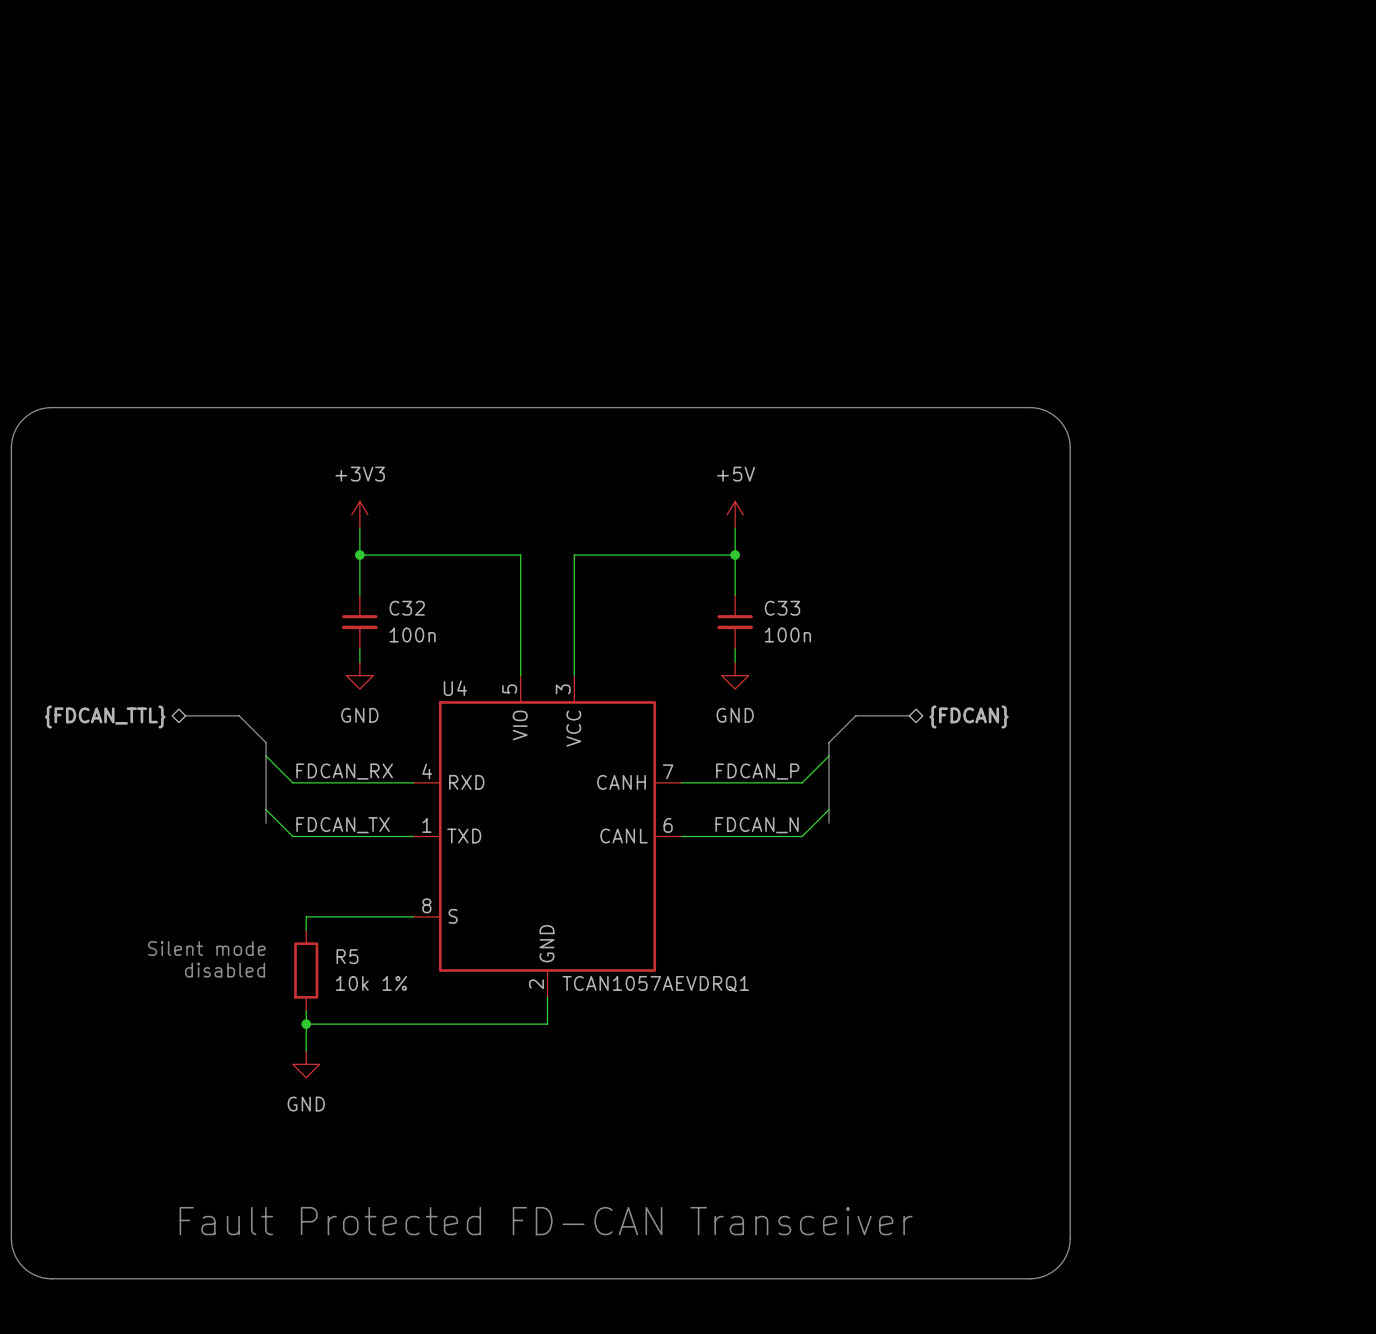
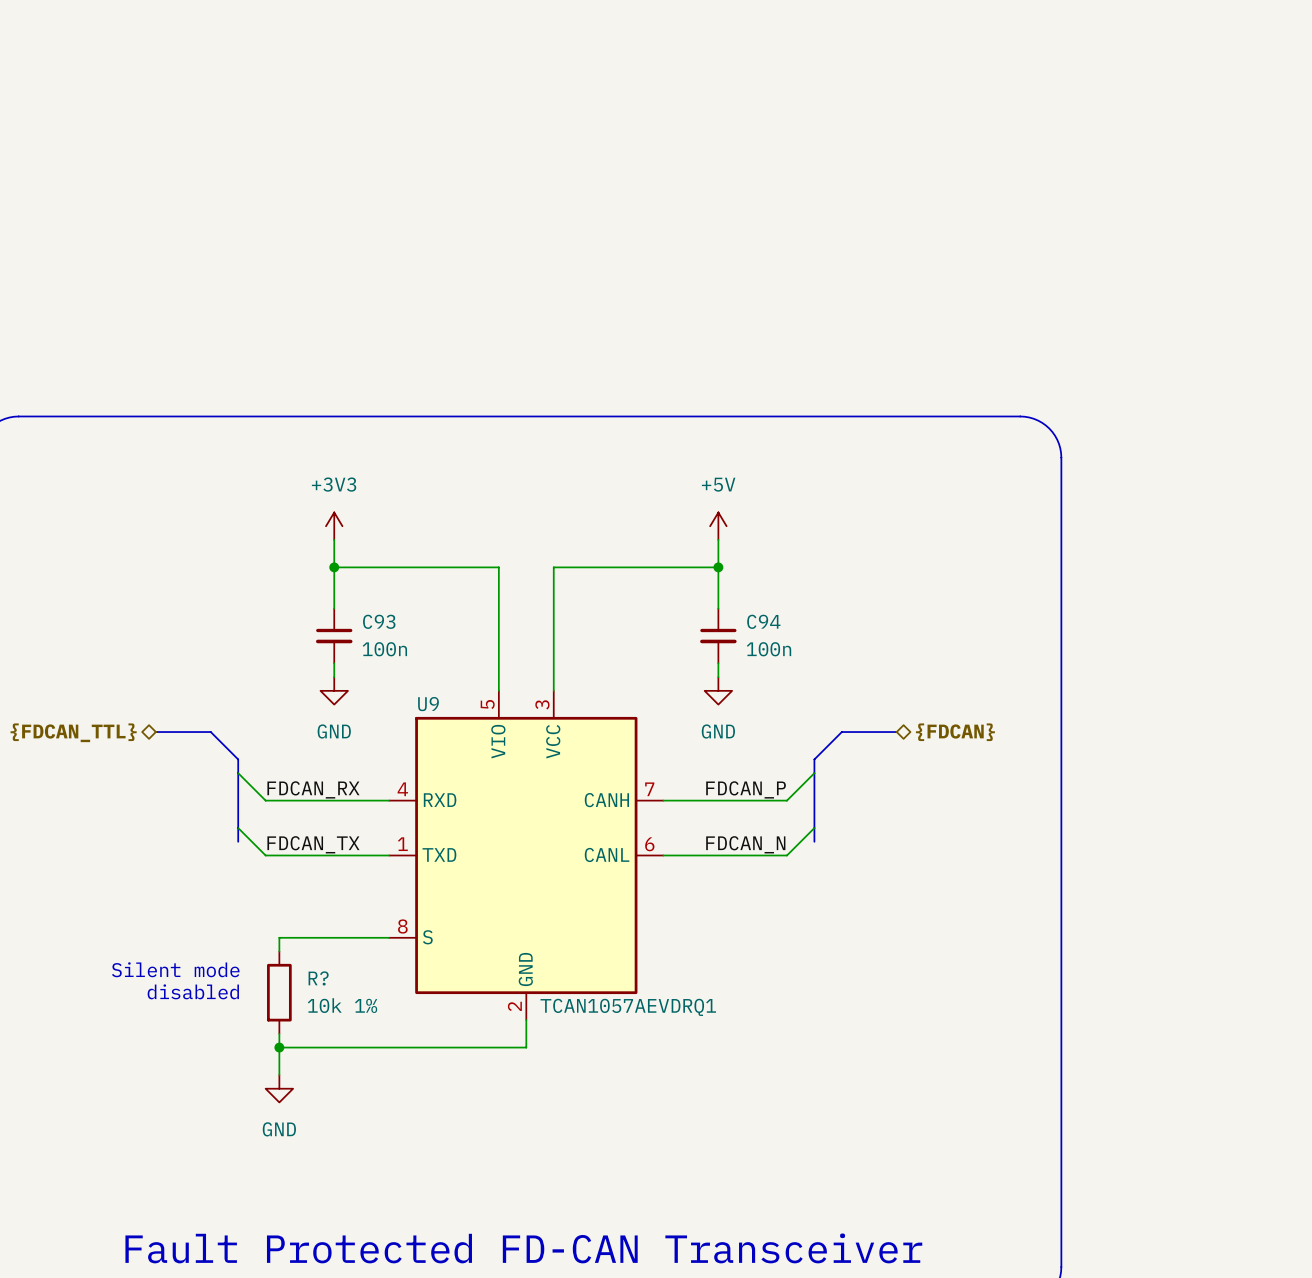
C32 name: C32 (407, 608) -> C93 (379, 621)
C33 name: C33 (782, 608) -> C94 (763, 621)
U4 name: U4 (455, 688) -> U9 (428, 704)
R5 name: R5 (347, 956) -> R? (318, 978)

